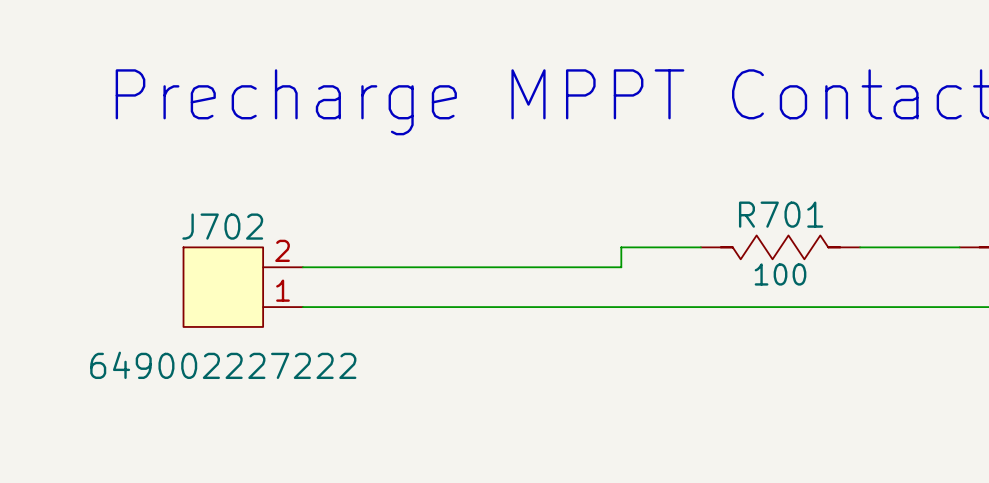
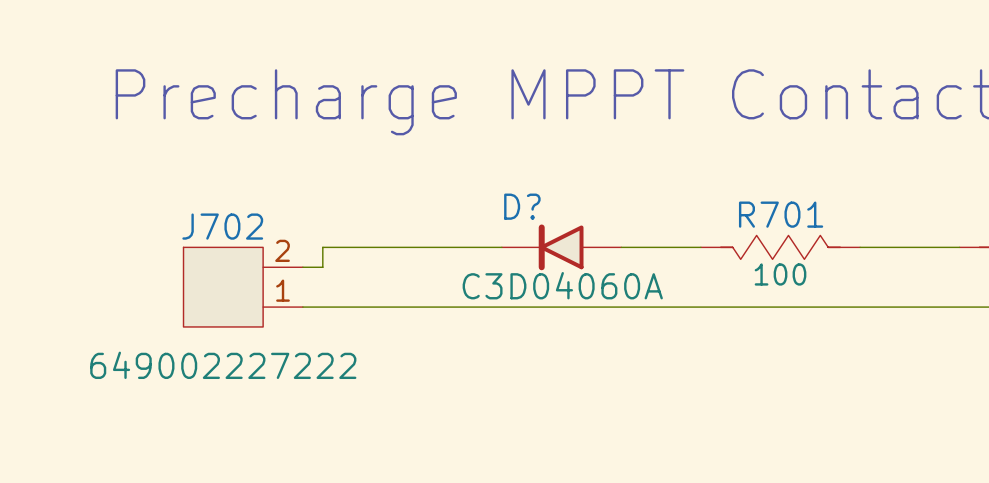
D?: none -> C3D04060A (561, 247)
wire: (621, 247) (621, 267) (322, 267) -> (501, 247) (322, 247) (322, 267)

